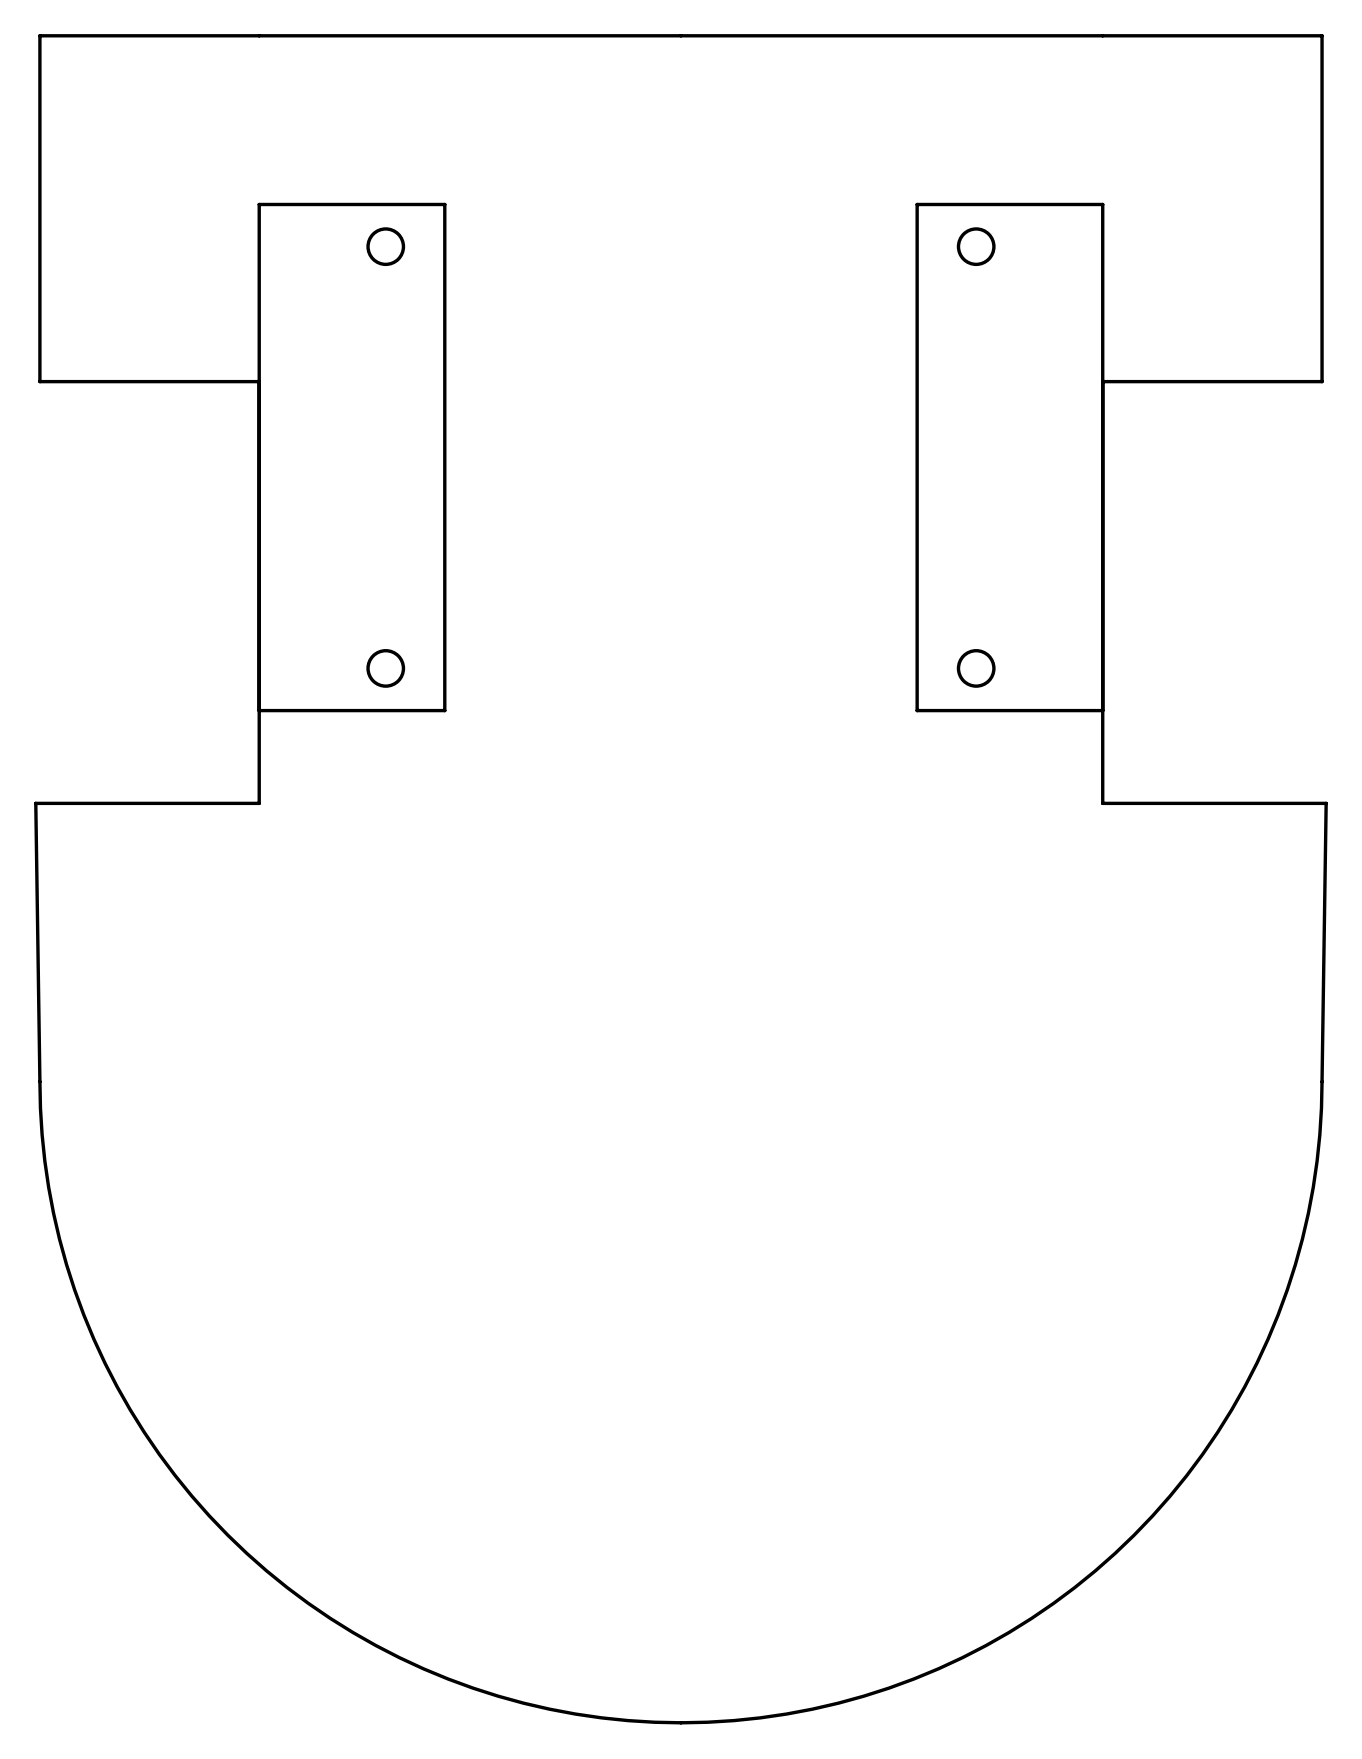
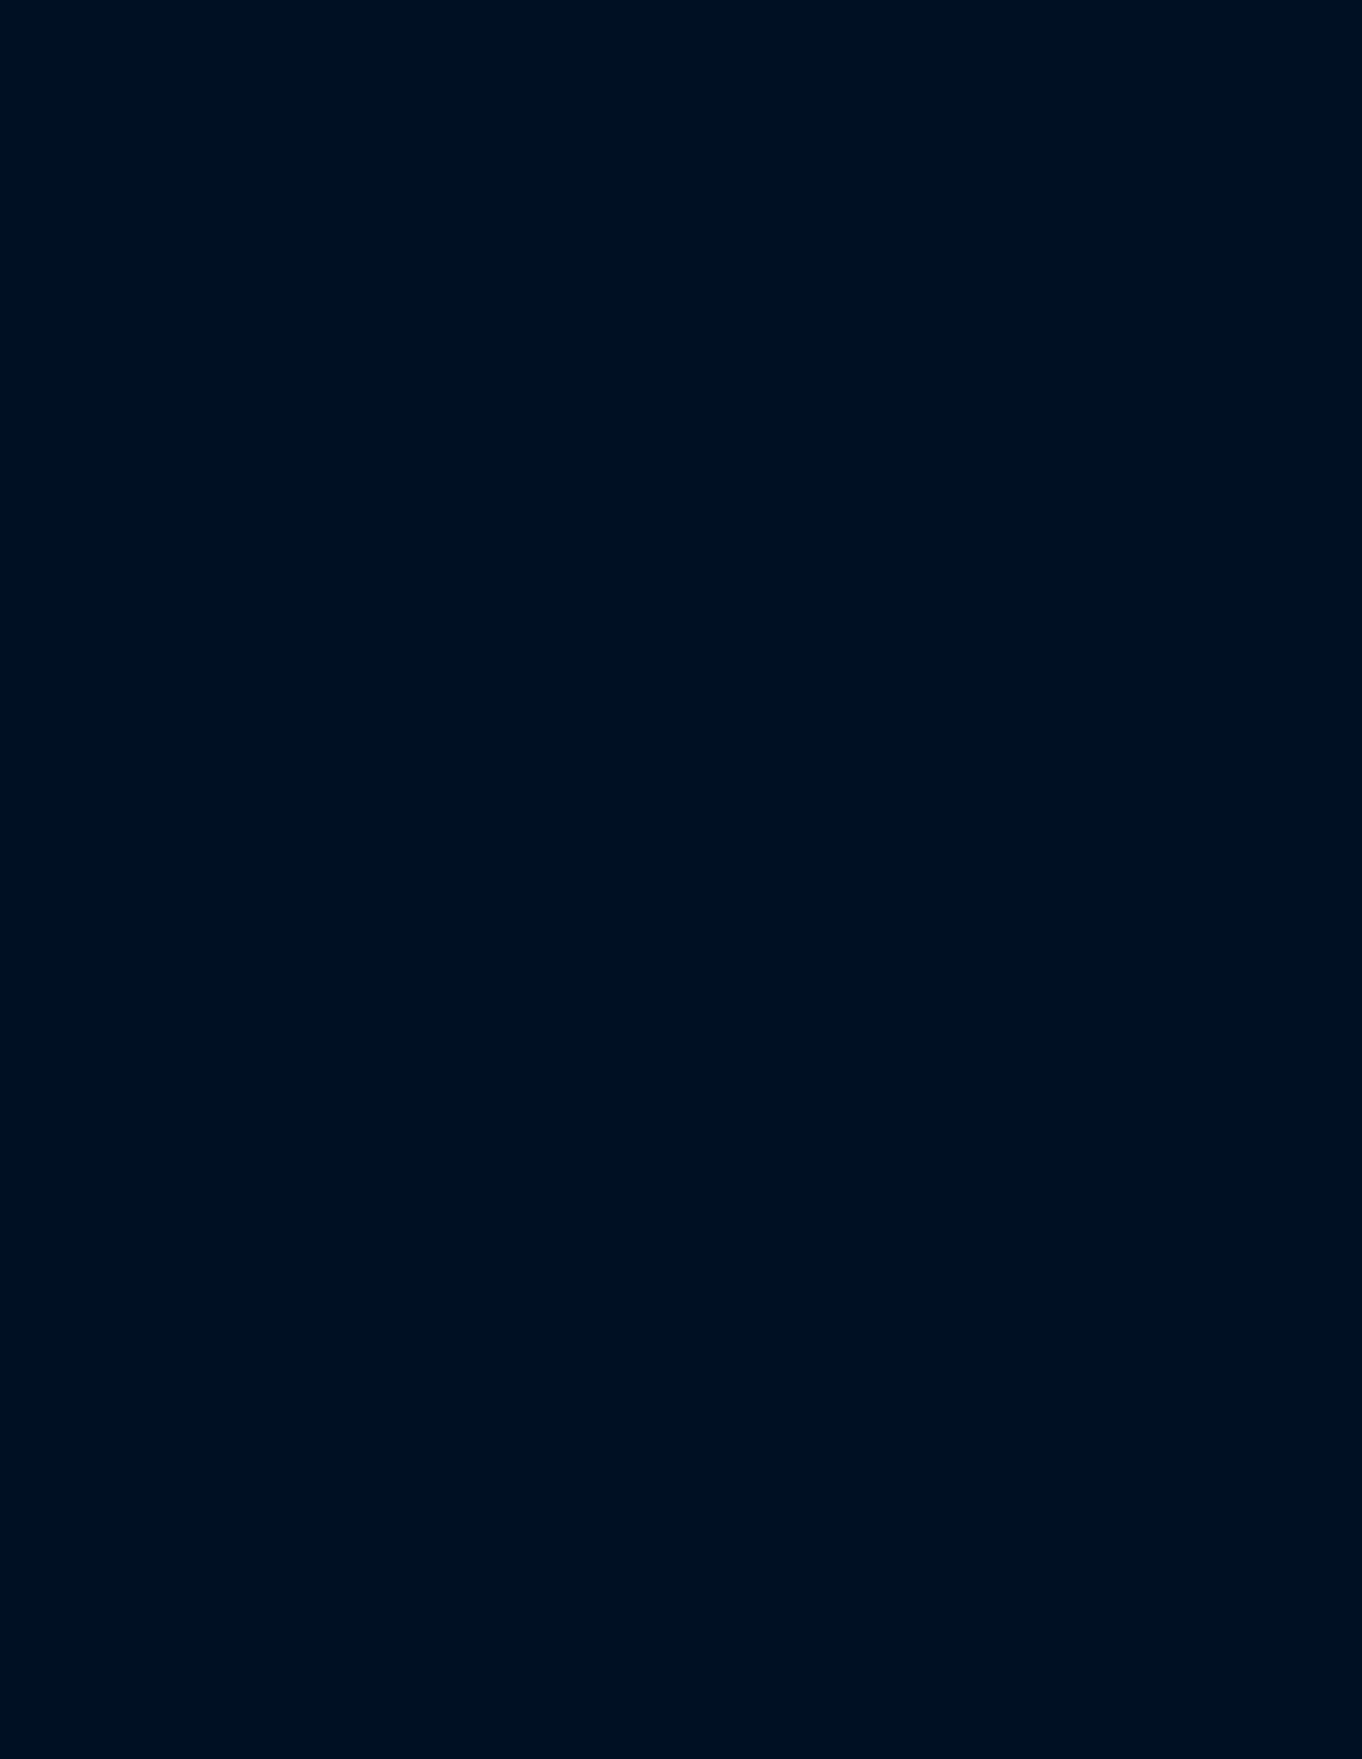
round board edge: [366, 227, 406, 267] -> none
round board edge: [956, 227, 996, 267] -> none
board edge: (259, 381) (39, 381) (39, 35) (1322, 35) (1322, 381) (1102, 381) -> none
round board edge: [366, 649, 406, 688] -> none
round board edge: [956, 649, 996, 688] -> none
board edge: (259, 710) (444, 710) (444, 204) (259, 204) (259, 803) (35, 803) (40, 1108) (48, 1187) (66, 1264) (83, 1314) (105, 1363) (130, 1409) (159, 1454) (191, 1496) (227, 1535) (266, 1570) (308, 1603) (352, 1632) (399, 1657) (447, 1678) (498, 1696) (575, 1714) (628, 1720) (680, 1722) (733, 1720) (786, 1714) (863, 1696) (914, 1678) (962, 1657) (1009, 1632) (1053, 1603) (1095, 1570) (1134, 1535) (1170, 1496) (1202, 1454) (1231, 1409) (1256, 1363) (1278, 1314) (1295, 1264) (1313, 1187) (1321, 1108) (1326, 803) (1102, 803) (1102, 204) (917, 204) (917, 710) (1102, 710) -> none

